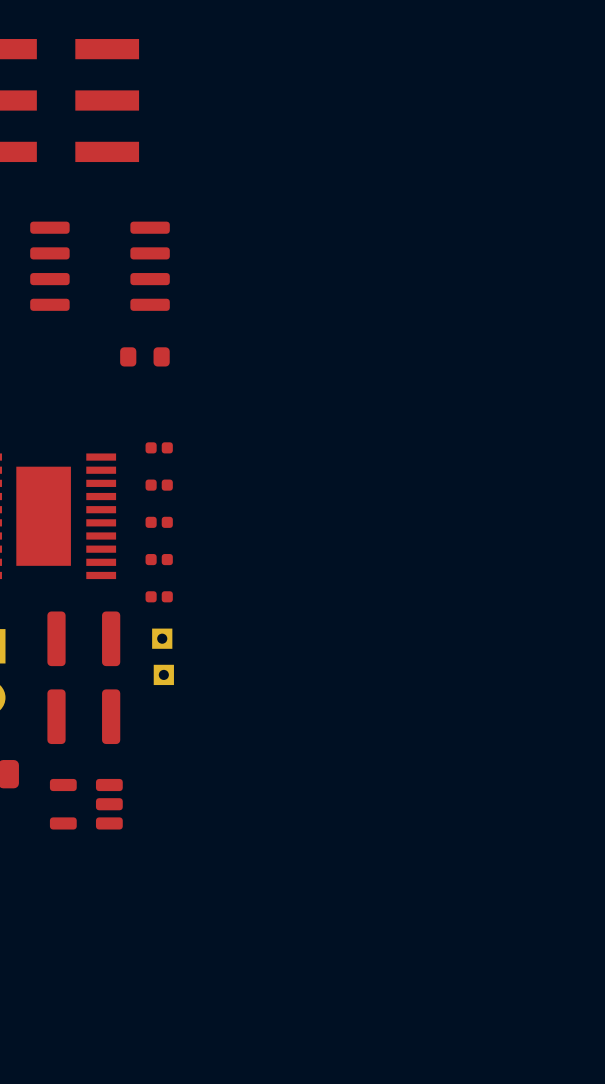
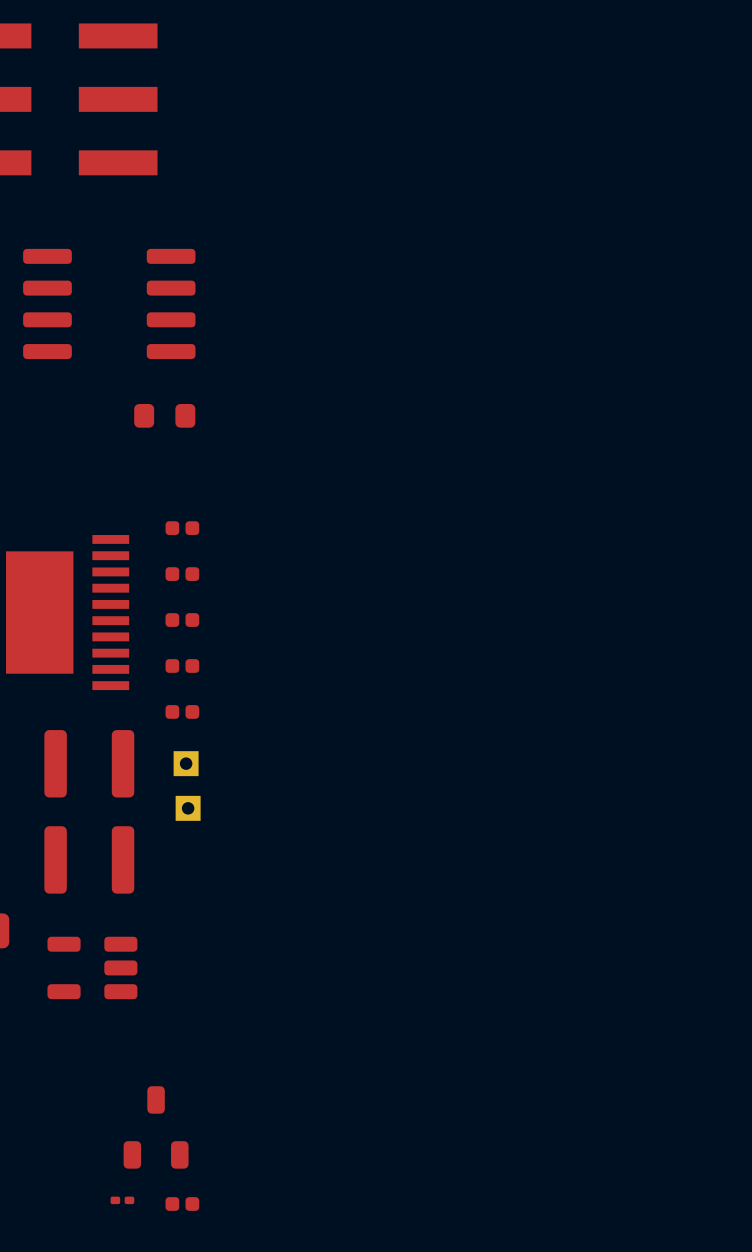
part: none -> (156, 1127)
part: none -> (122, 1200)
part: none -> (182, 1203)

